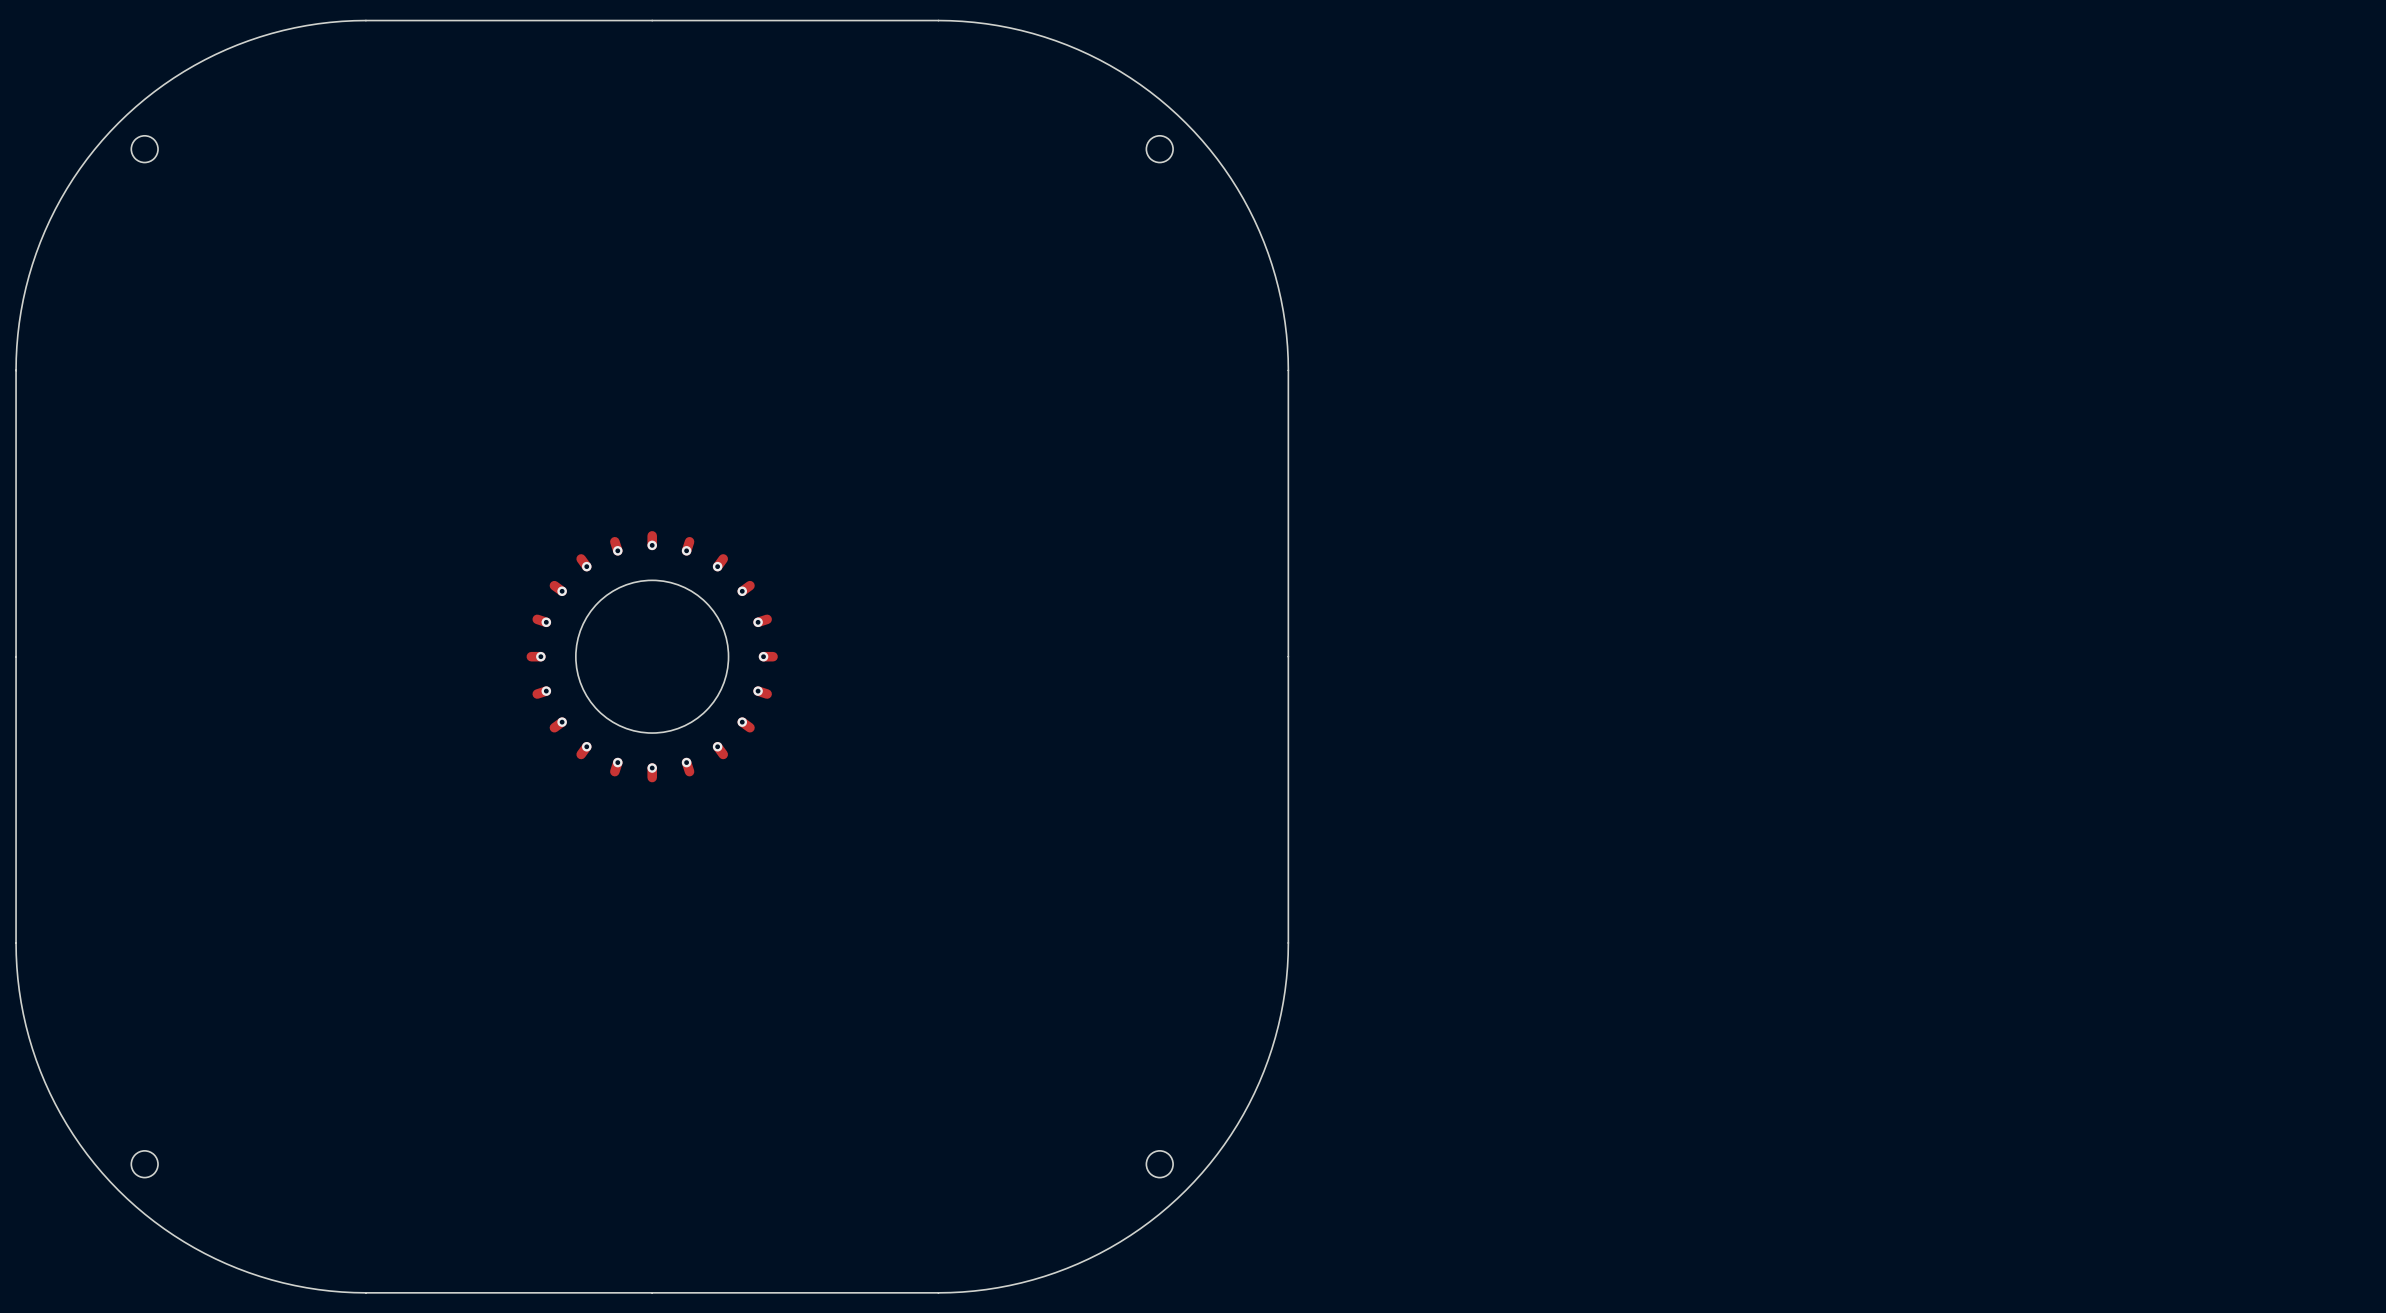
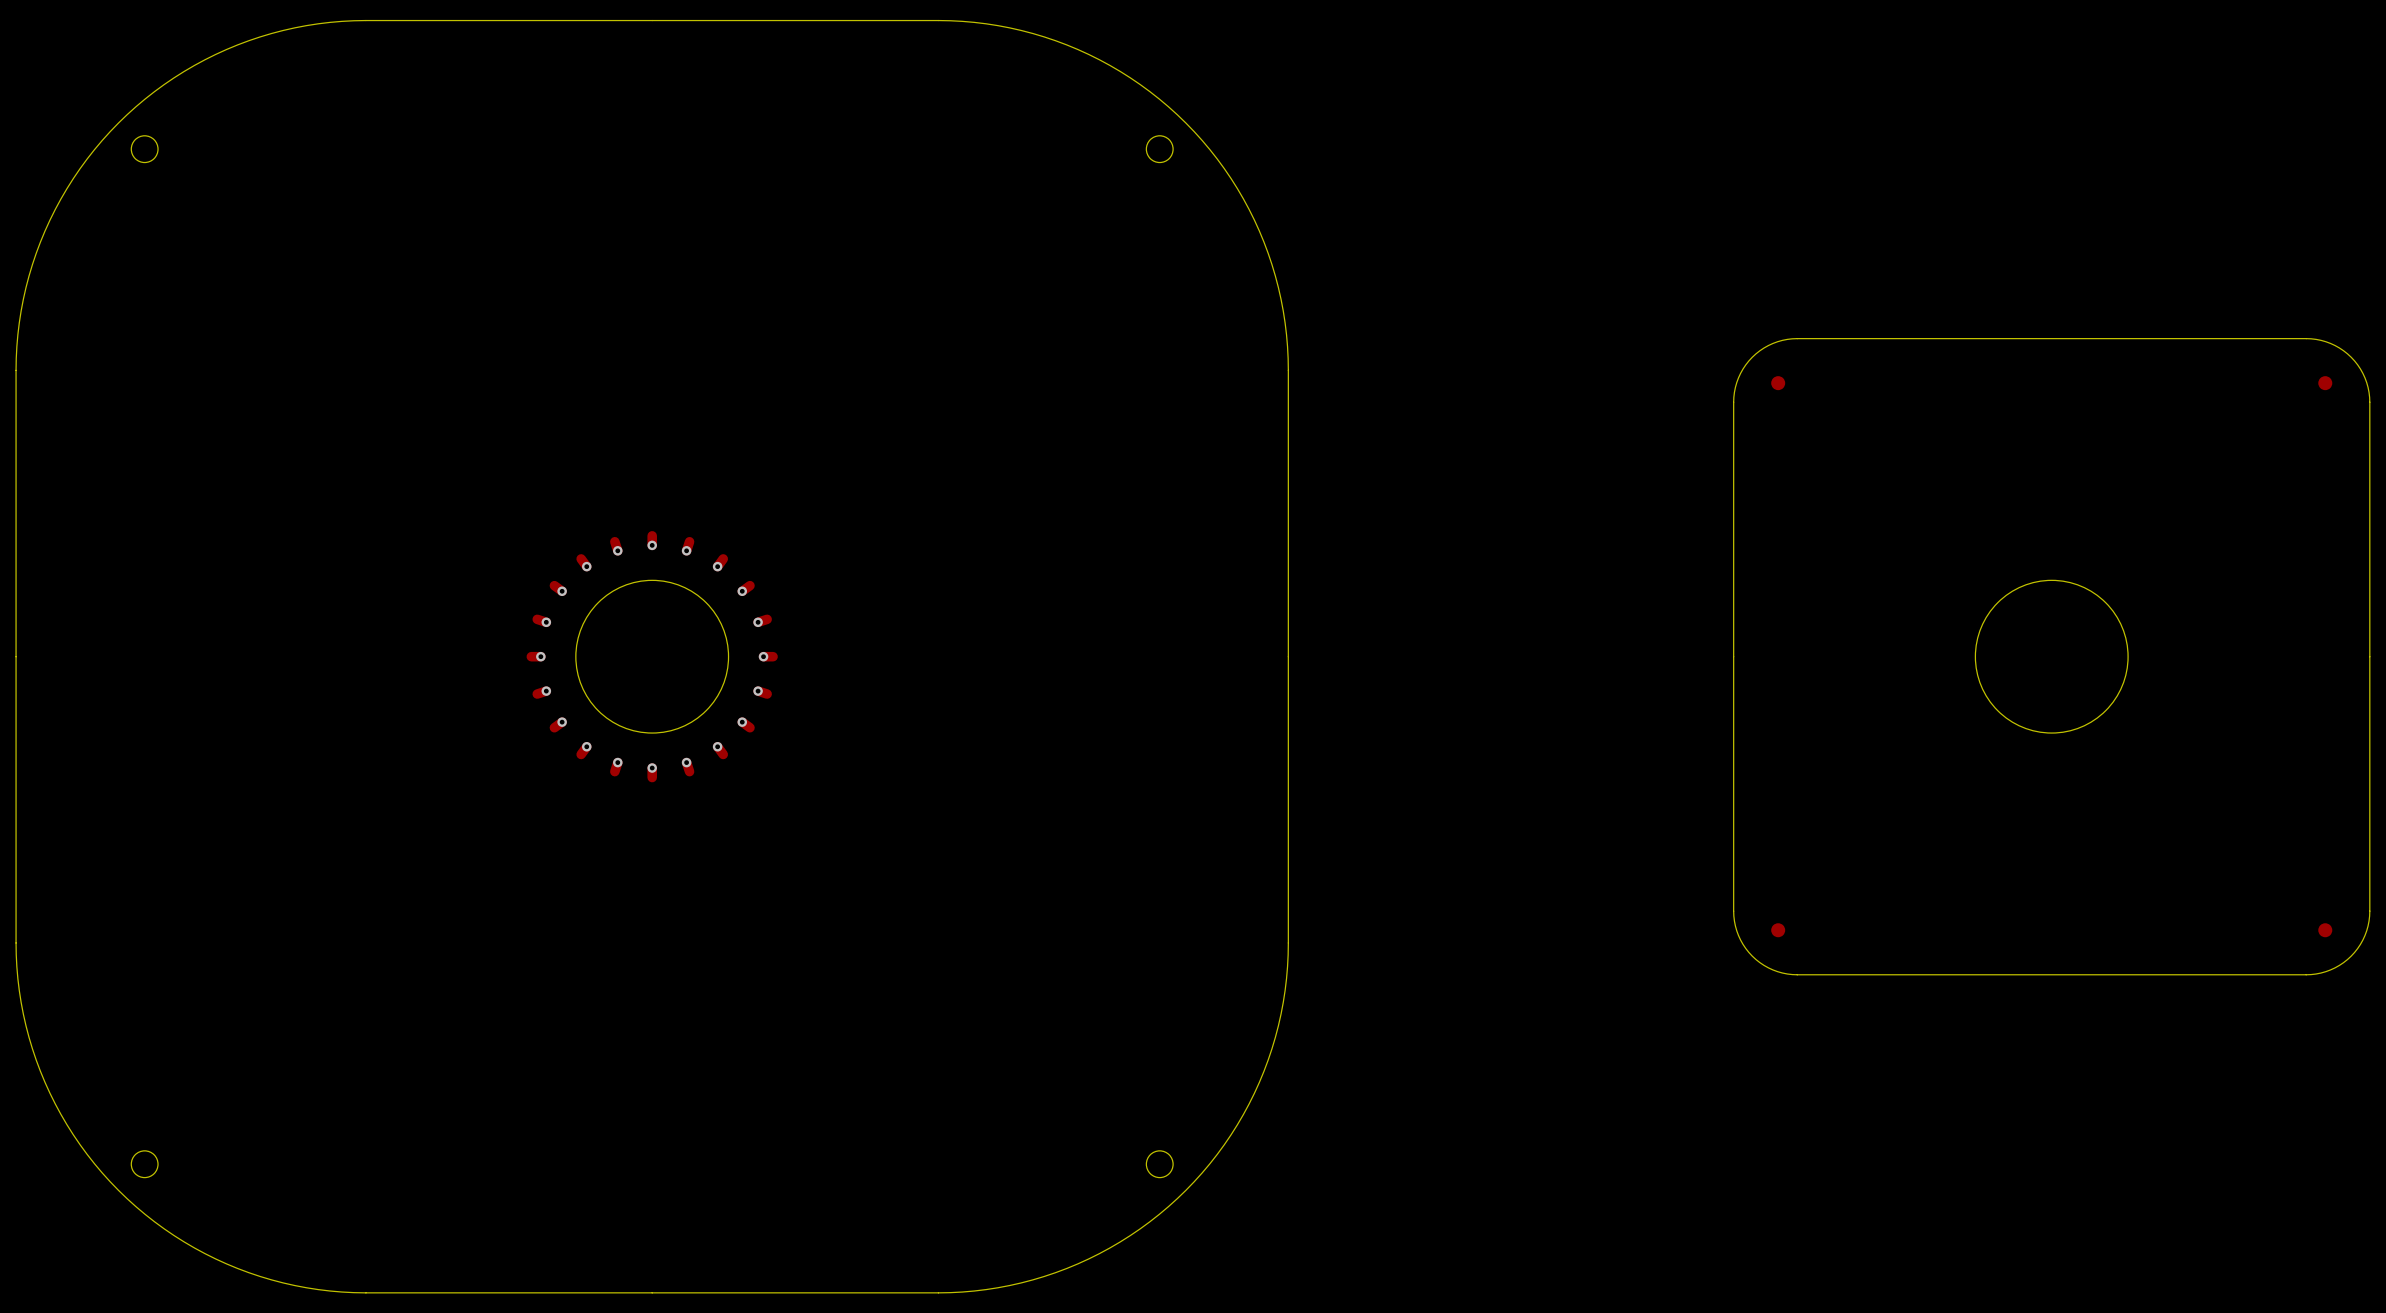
board edge: none -> (1797, 338) (2311, 338) (2335, 345) (2354, 360) (2366, 382) (2369, 402) (2369, 911) (2368, 926) (2362, 940) (2347, 959) (2325, 971) (2306, 974) (1797, 974) (1782, 973) (1768, 967) (1748, 952) (1736, 930) (1733, 911) (1733, 397) (1740, 373) (1752, 357) (1772, 343) (1797, 338)
part: none -> (1778, 383)
part: none -> (2325, 383)
round board edge: none -> [1975, 580, 2129, 734]
part: none -> (1778, 930)
part: none -> (2325, 930)

